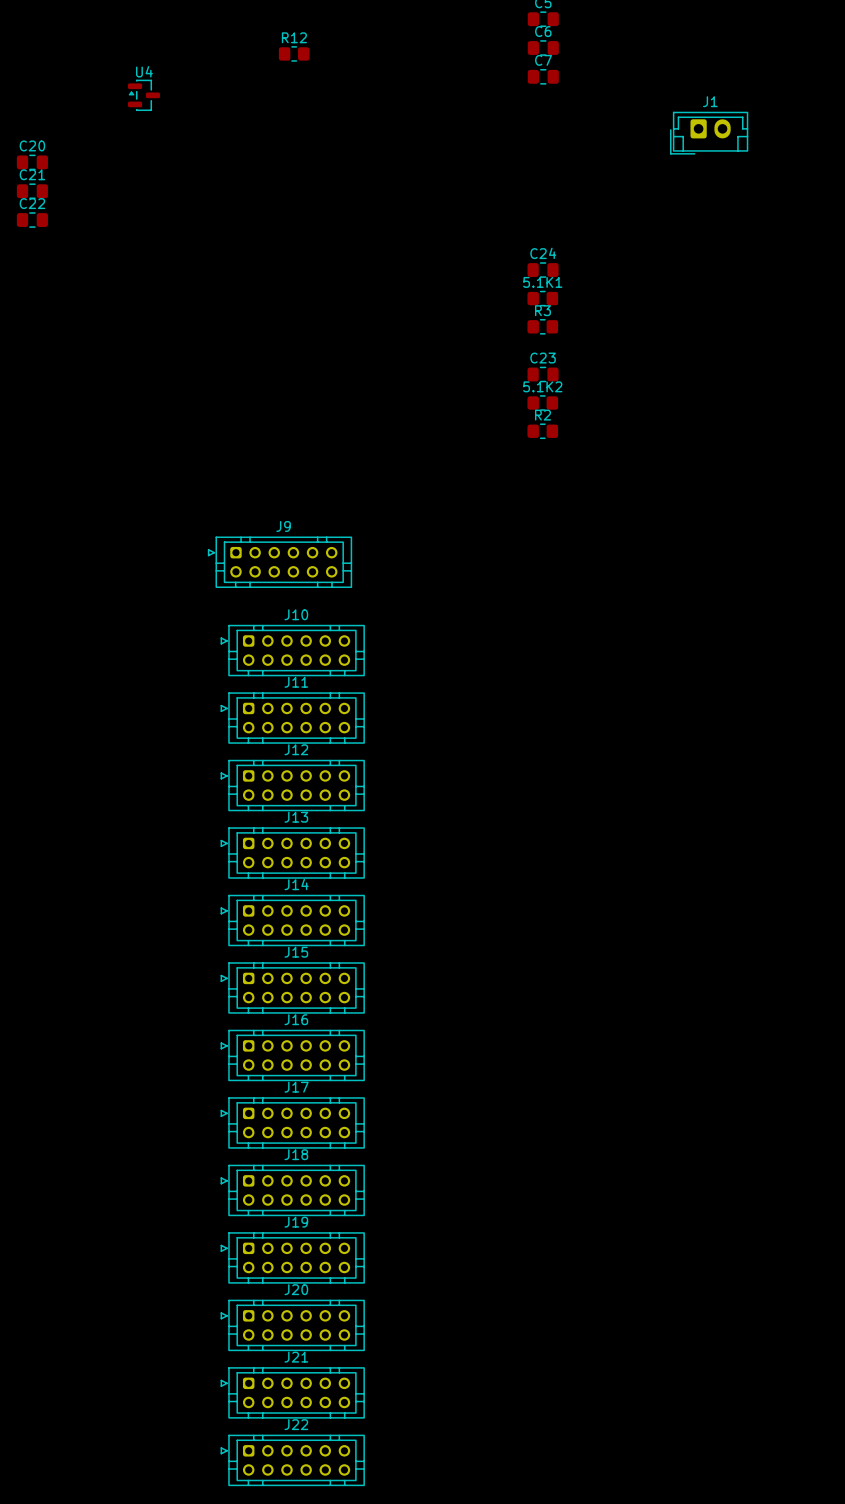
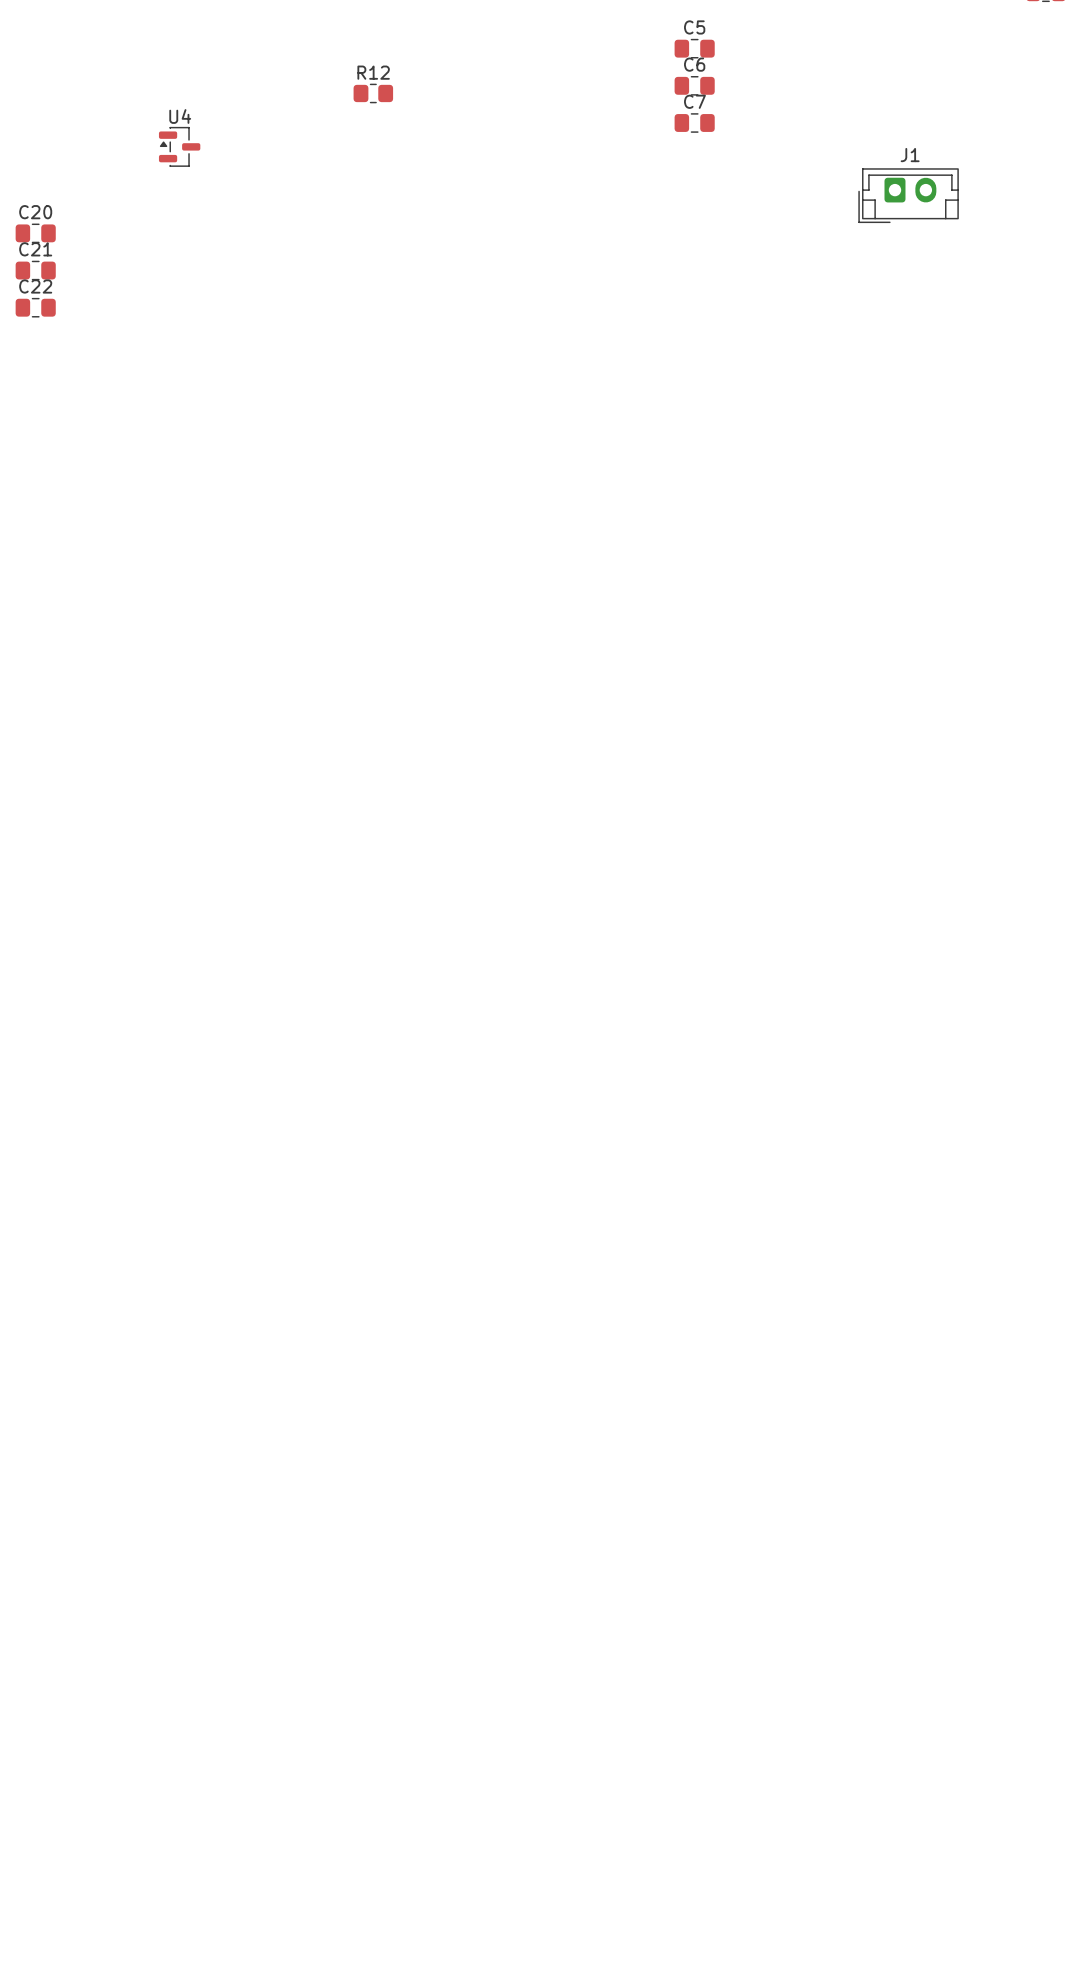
C24: (543, 270) -> none
5.1K1: (542, 298) -> none
R3: (542, 326) -> none
C23: (543, 374) -> none
5.1K2: (542, 403) -> none
R2: (542, 431) -> none
J9: (280, 562) -> none
J10: (292, 650) -> none
J11: (292, 718) -> none
J12: (292, 785) -> none
J13: (292, 853) -> none
J14: (292, 920) -> none
J15: (292, 987) -> none
J16: (292, 1055) -> none
J17: (292, 1122) -> none
J18: (292, 1190) -> none
J19: (292, 1257) -> none
J20: (292, 1325) -> none
J21: (292, 1392) -> none
J22: (292, 1460) -> none

